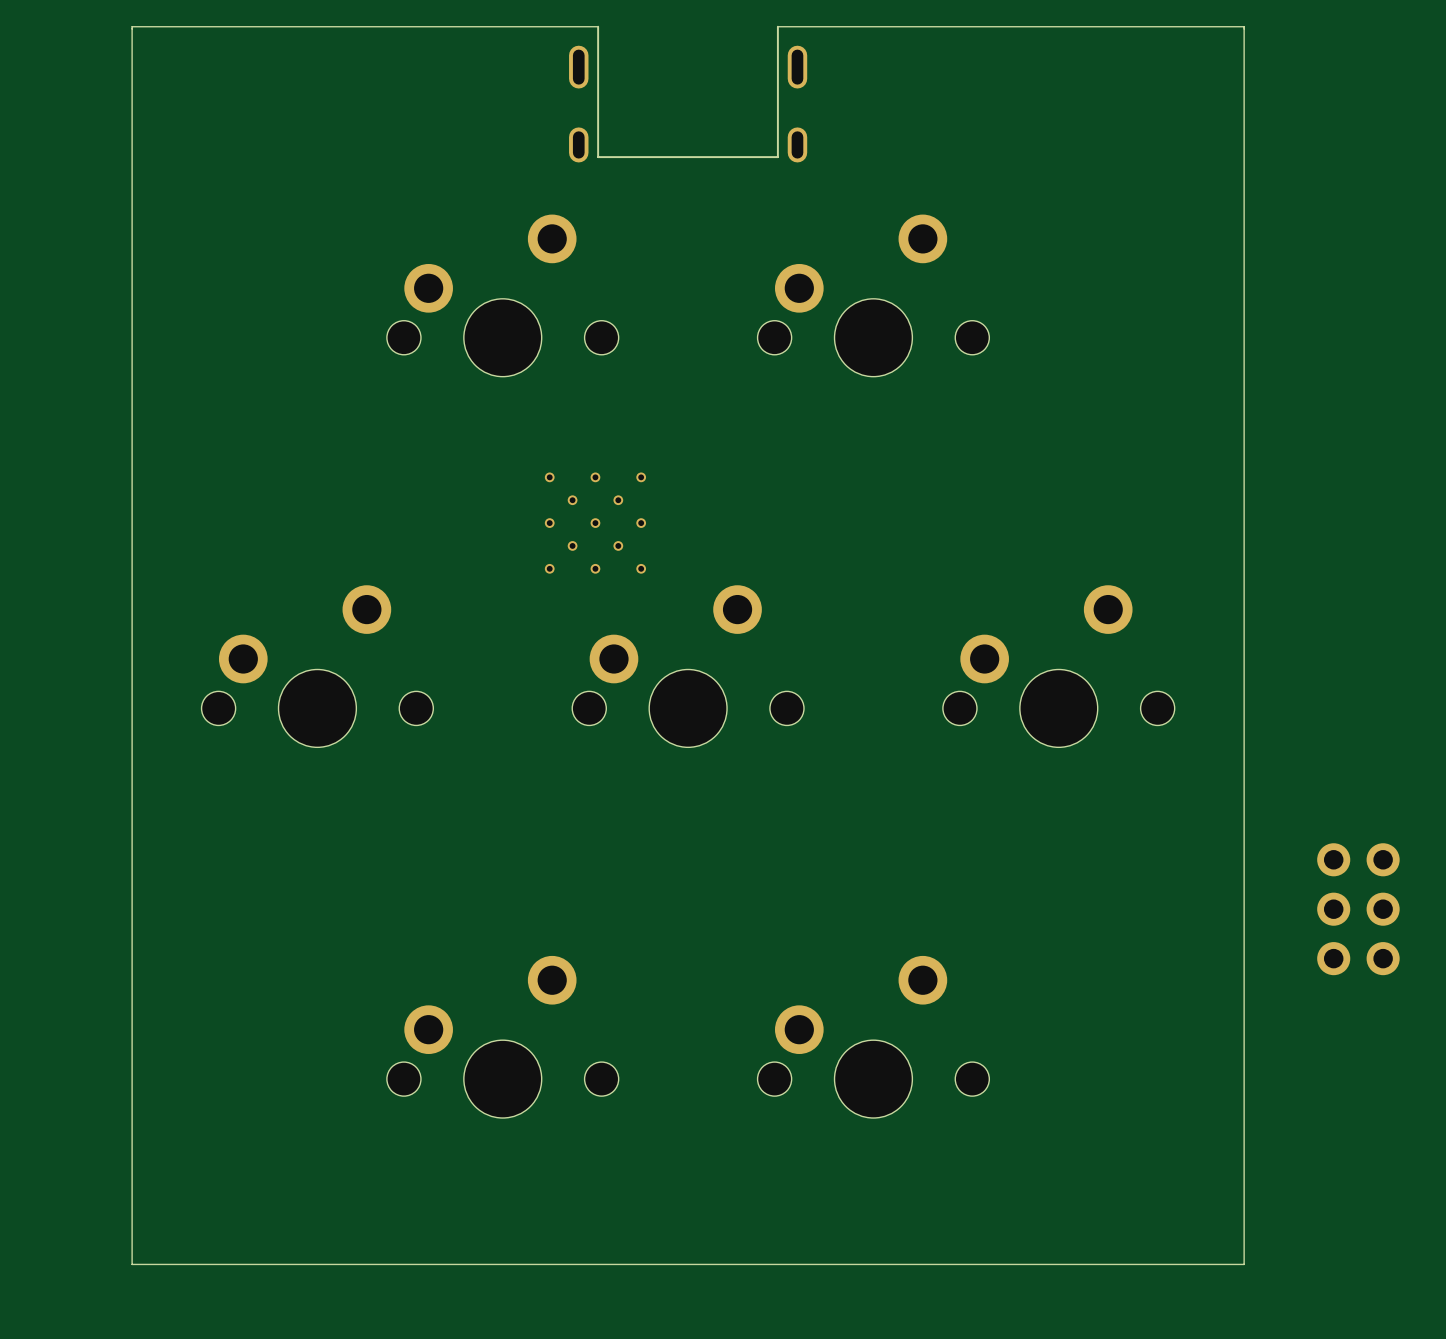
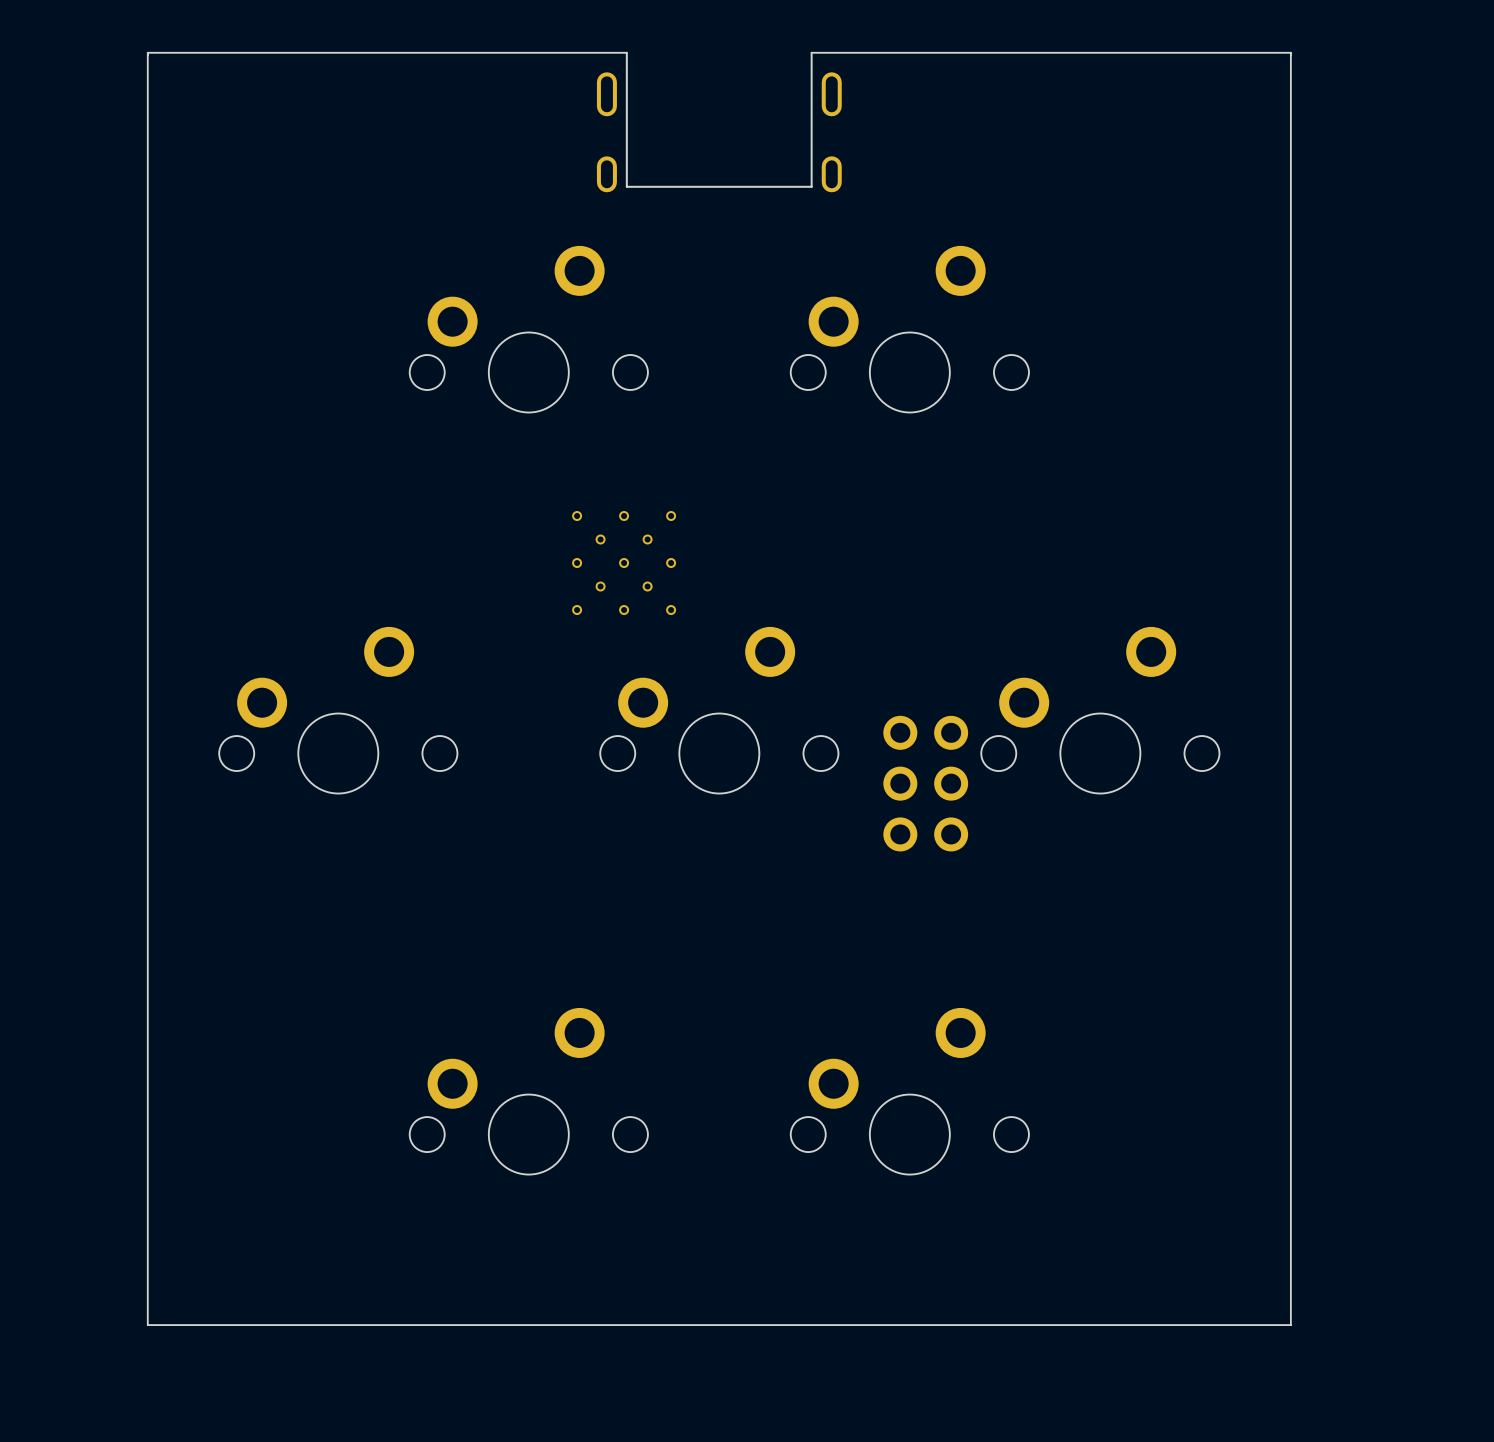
part: none -> (925, 783)
part: (1358, 909) -> none

